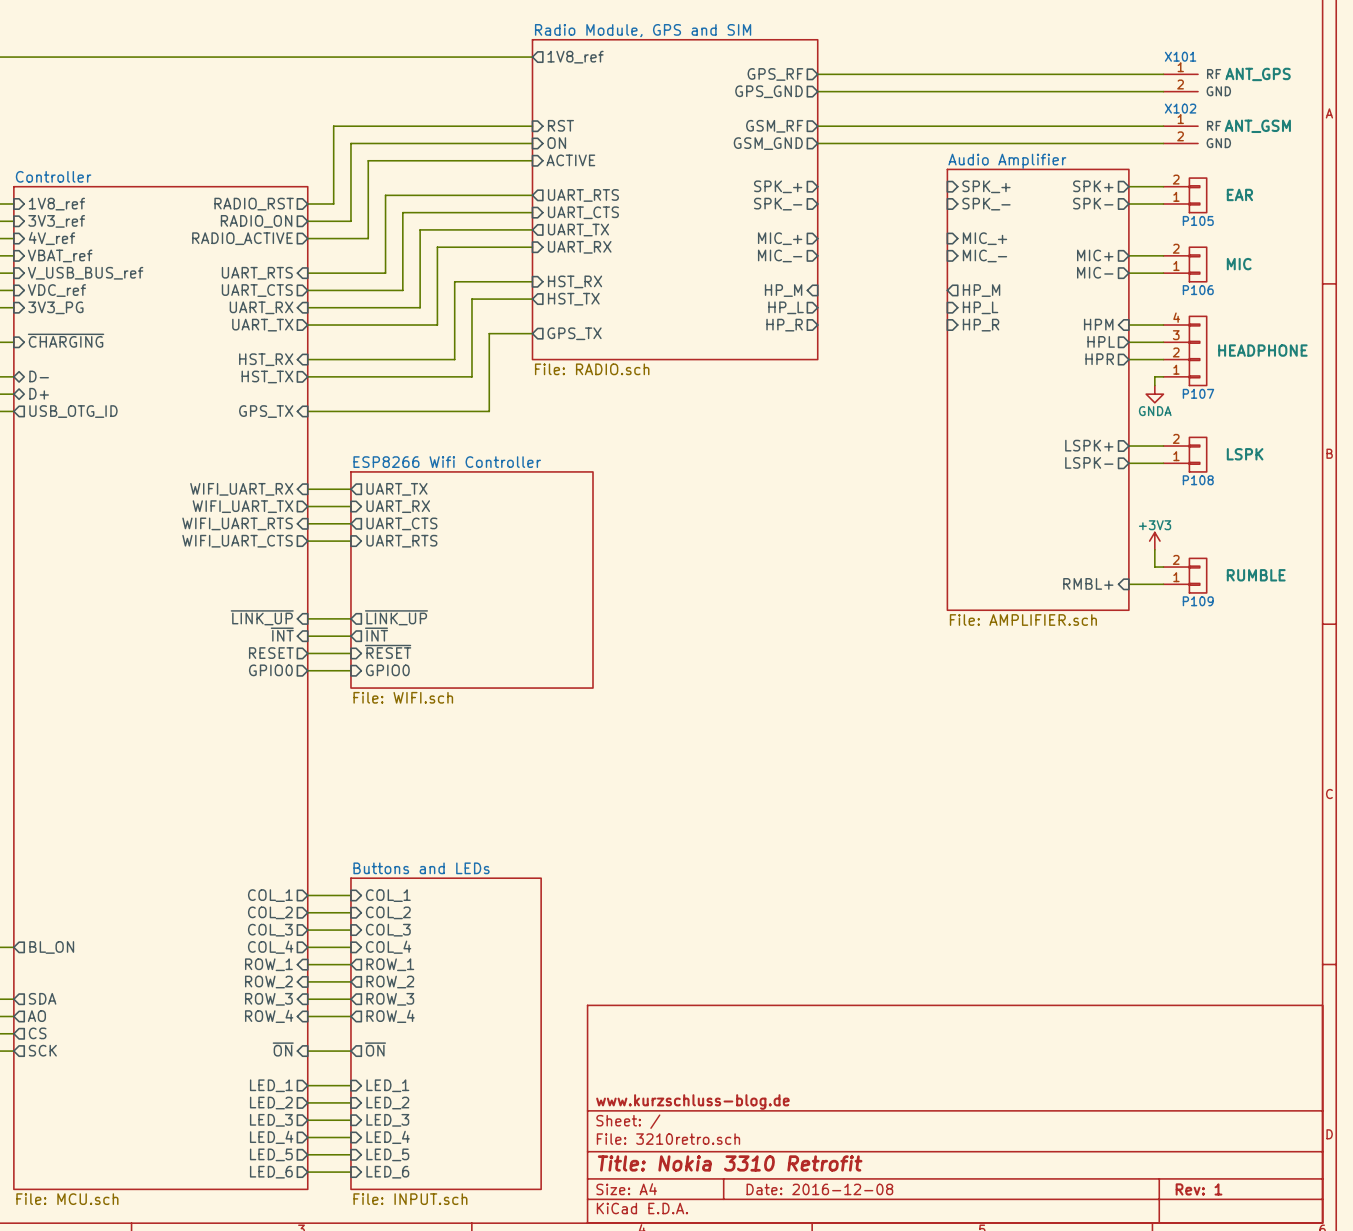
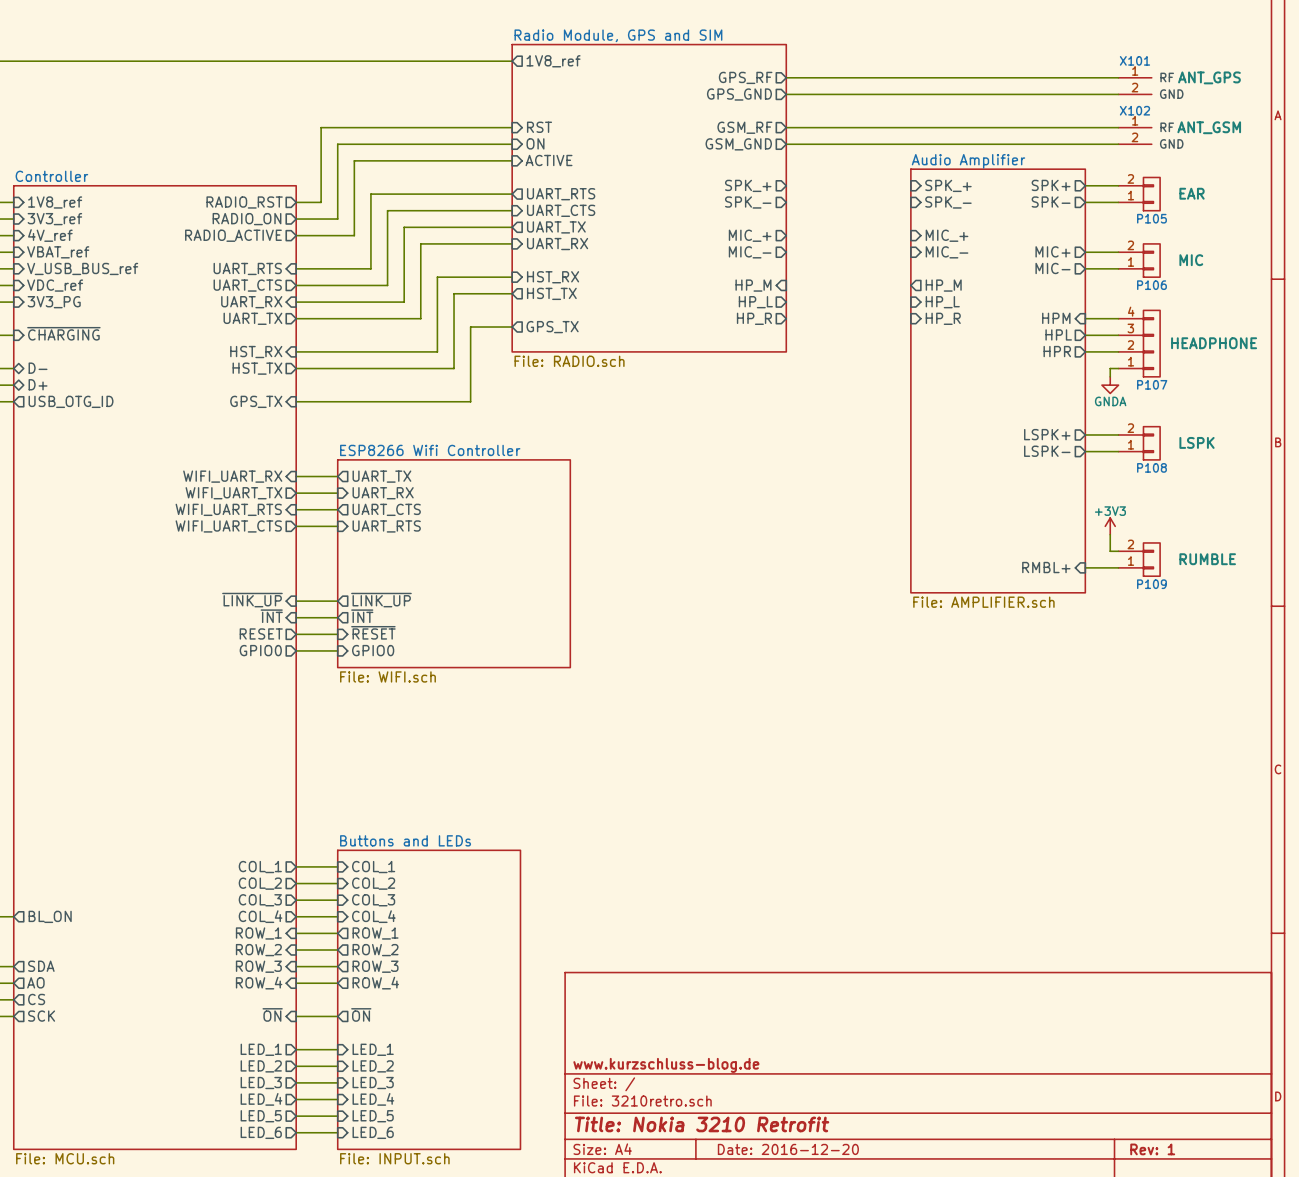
title block: Title: Nokia 3310 Retrofit (730, 1163) -> Title: Nokia 3210 Retrofit (702, 1124)
title block: Date: 2016-12-08 (819, 1189) -> Date: 2016-12-20 (788, 1149)

